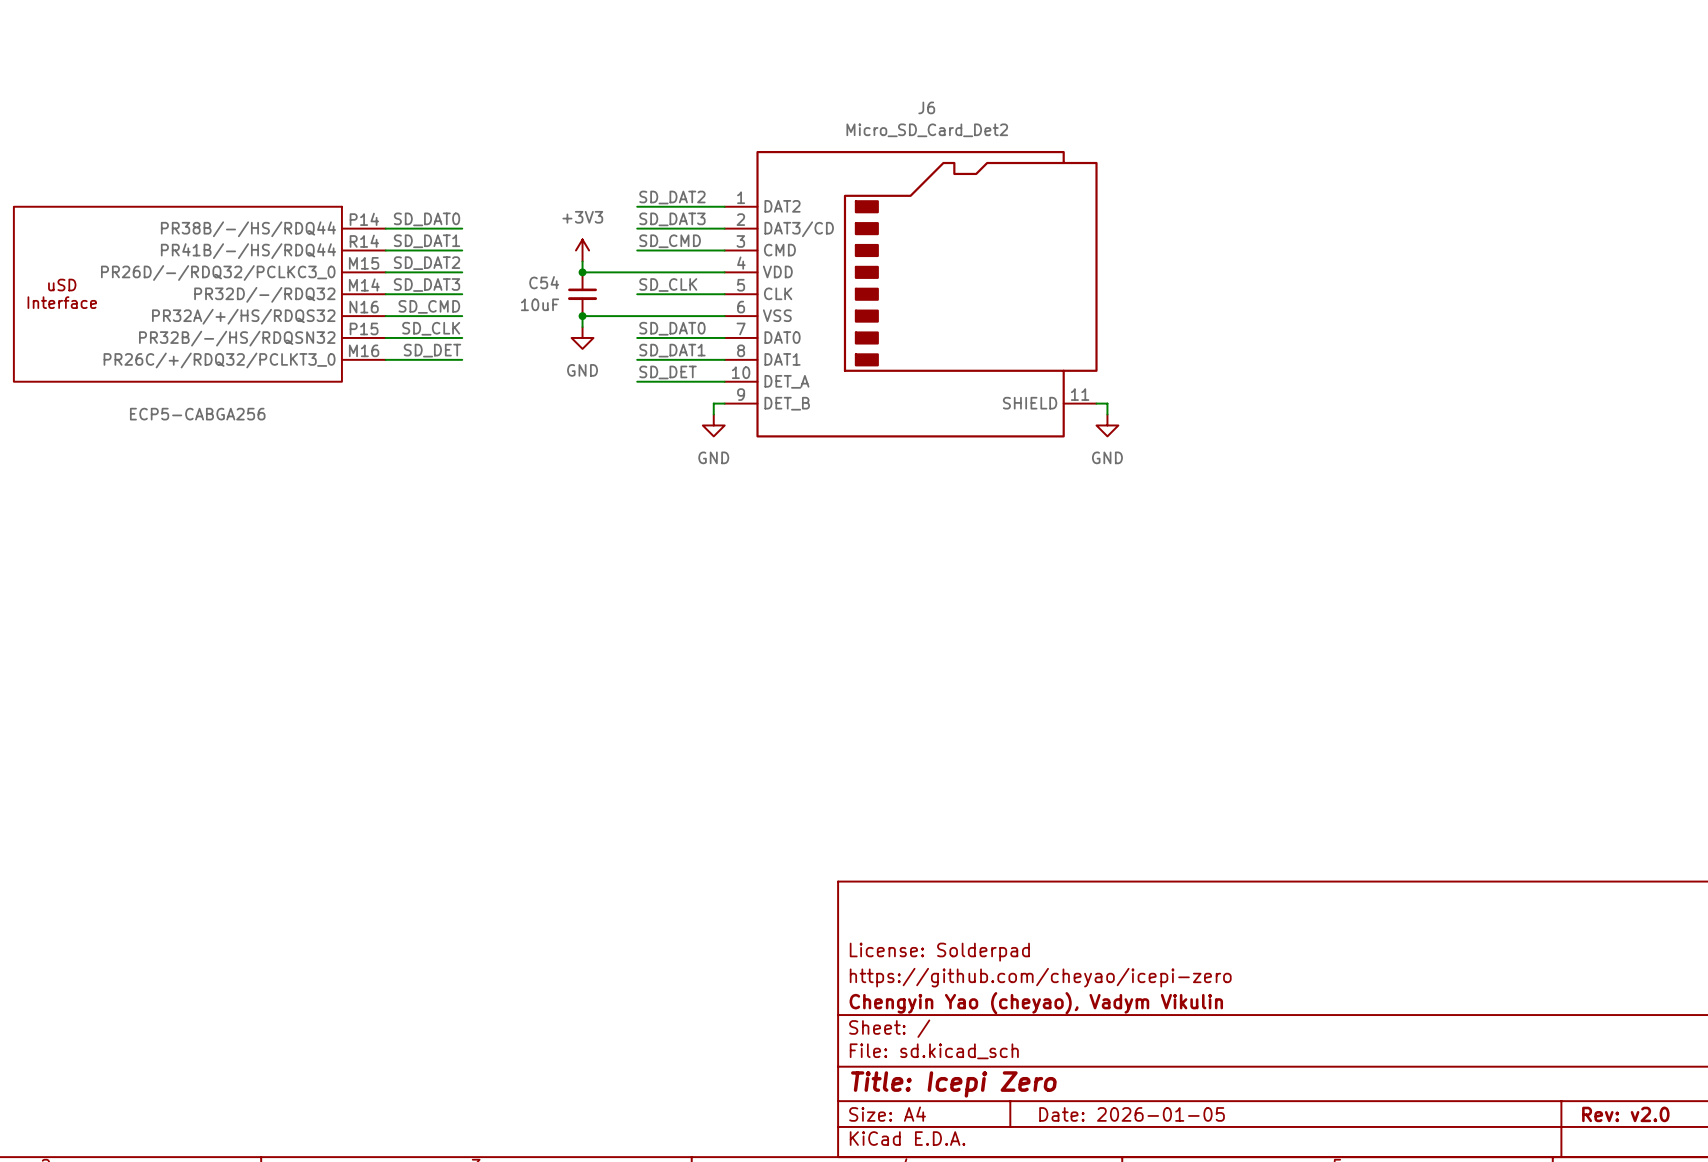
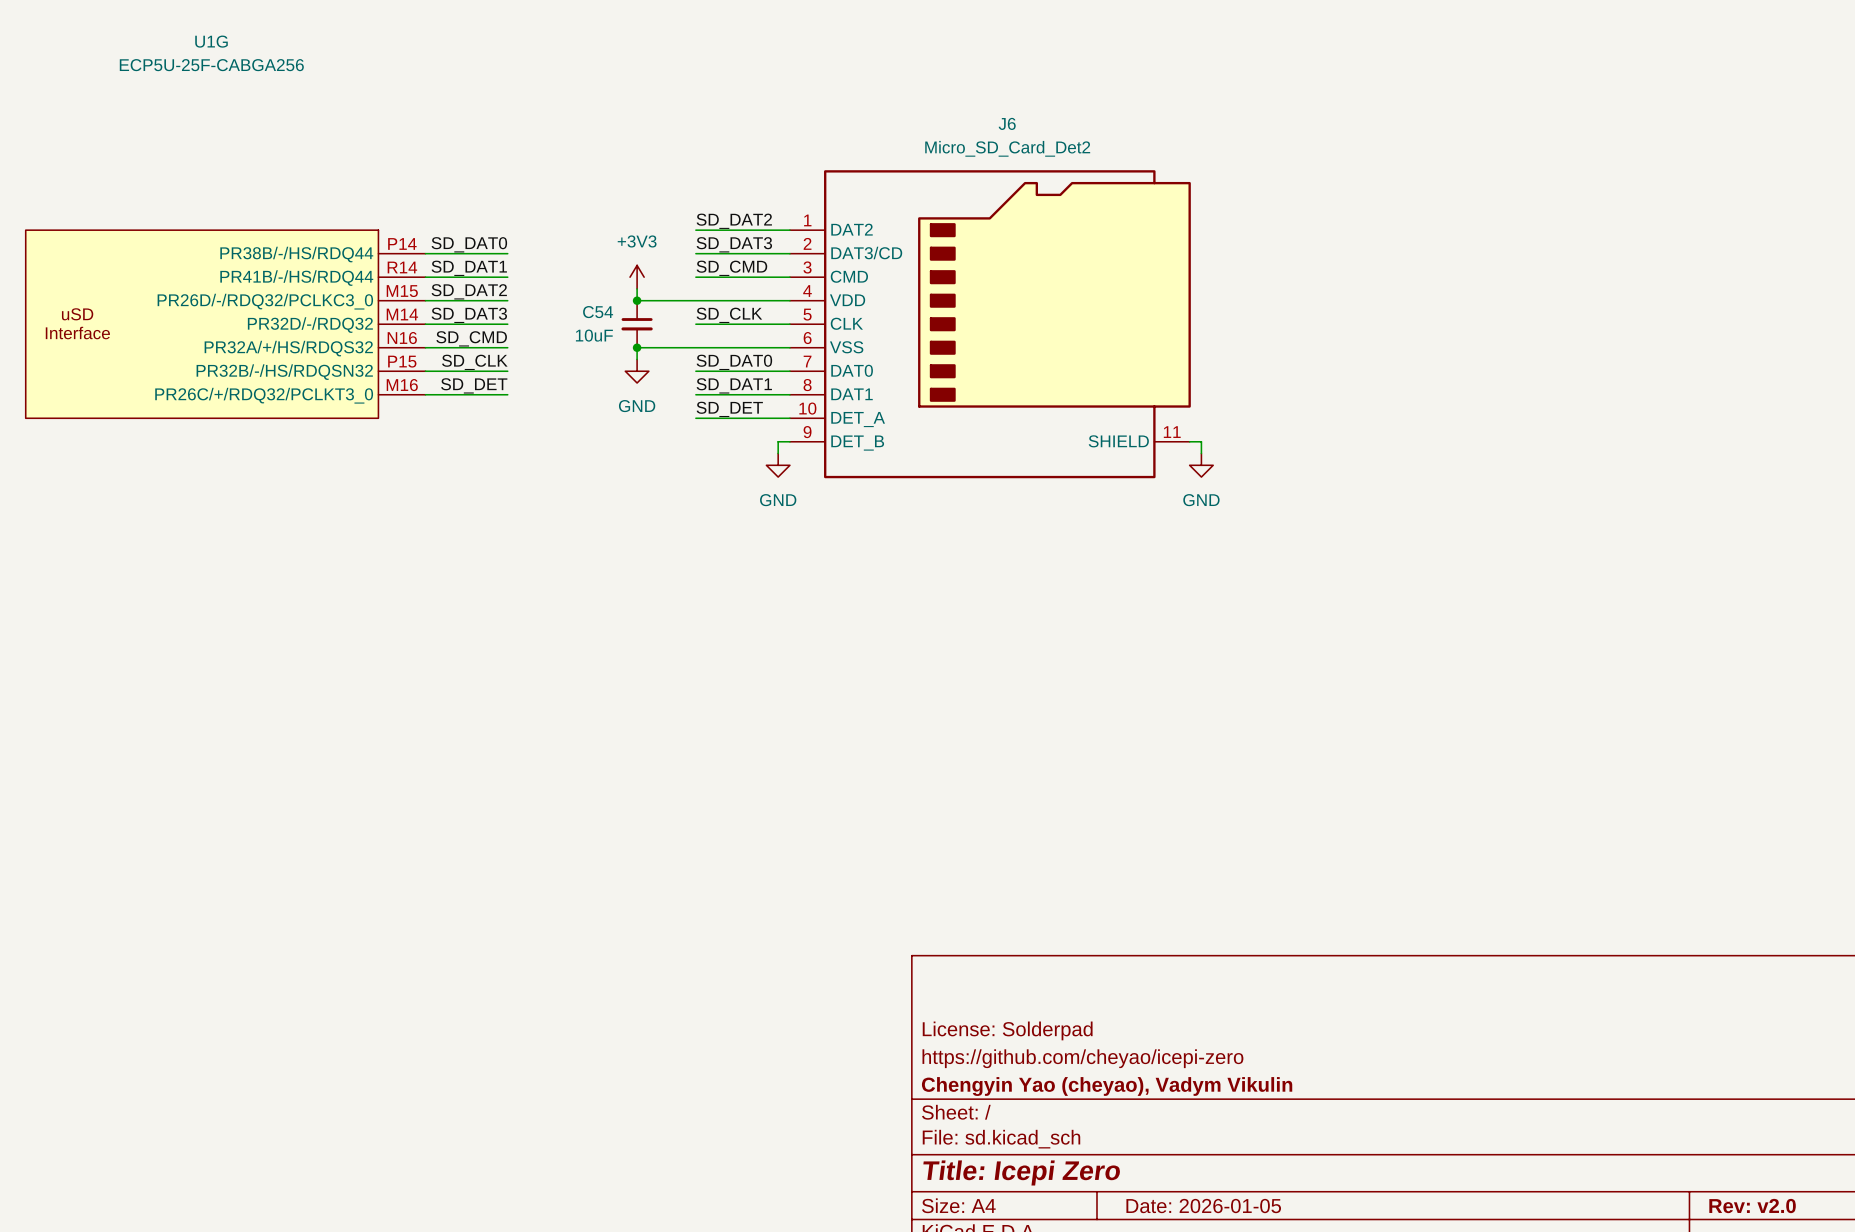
U1G name: none -> U1G (211, 41)
U1G value: ECP5-CABGA256 (197, 414) -> ECP5U-25F-CABGA256 (211, 65)

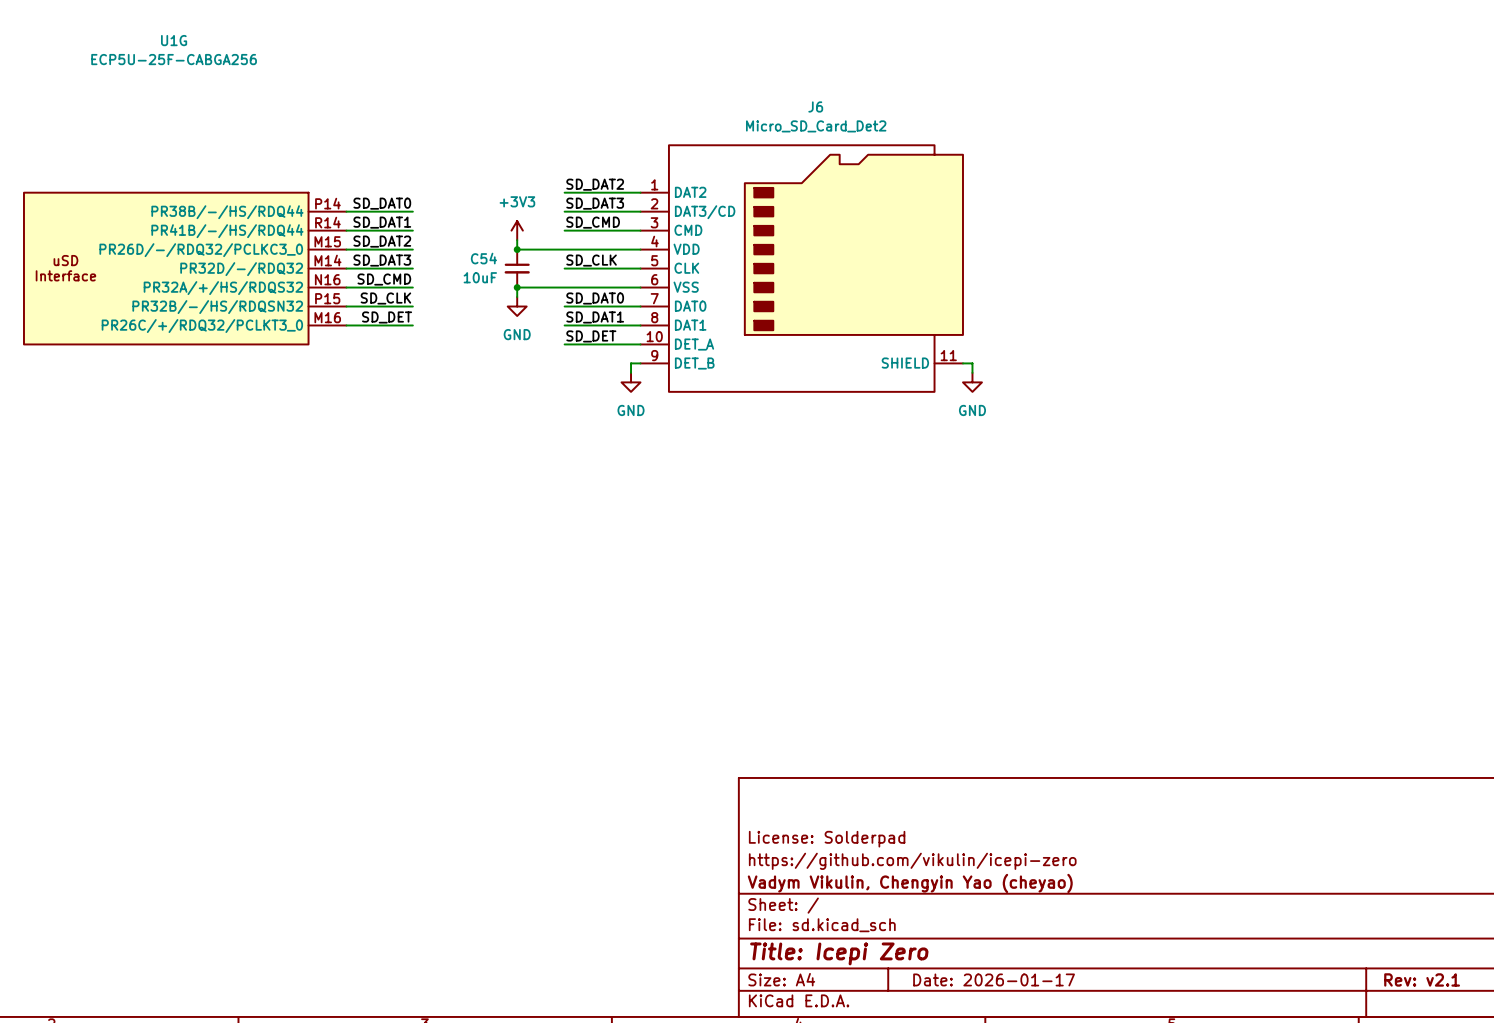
title block: https://github.com/cheyao/icepi-zero (1082, 1058) -> https://github.com/vikulin/icepi-zero (912, 861)
title block: Chengyin Yao (cheyao), Vadym Vikulin (1107, 1086) -> Vadym Vikulin, Chengyin Yao (cheyao) (910, 883)
title block: Date: 2026-01-05 (1203, 1206) -> Date: 2026-01-17 (994, 979)
title block: Rev: v2.0 (1752, 1206) -> Rev: v2.1 (1422, 979)

